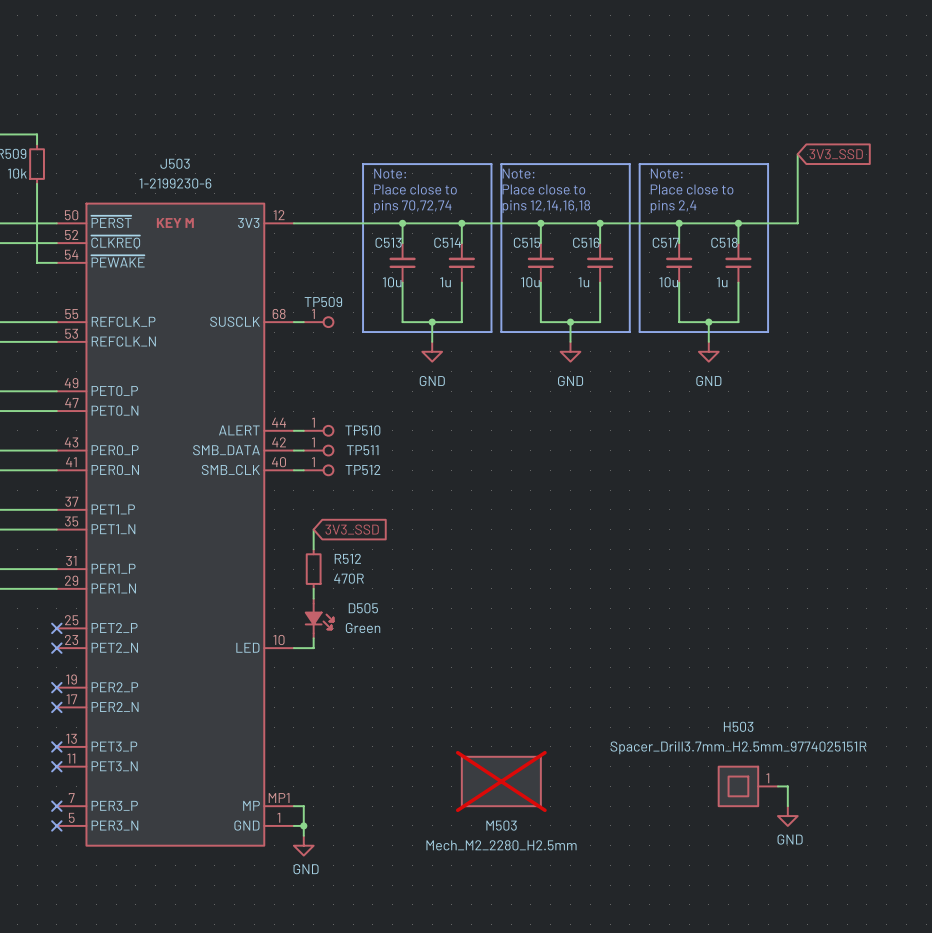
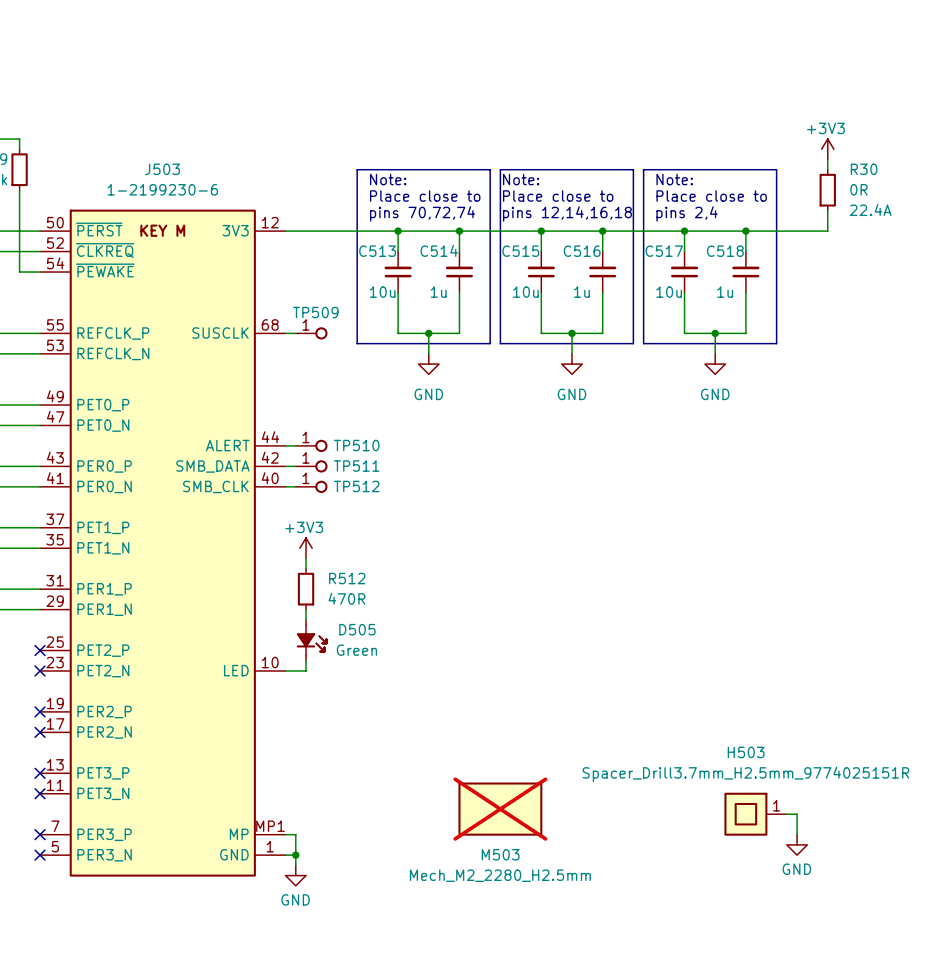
power symbol: none -> +3V3 (827, 149)
wire: (797, 154) (797, 223) -> (827, 210) (827, 231) (807, 231)
wire: none -> (827, 159) (827, 169)
global label: 3V3_SSD (836, 154) -> none
R30: none -> (827, 190)
power symbol: none -> +3V3 (306, 548)
global label: 3V3_SSD (352, 529) -> none

